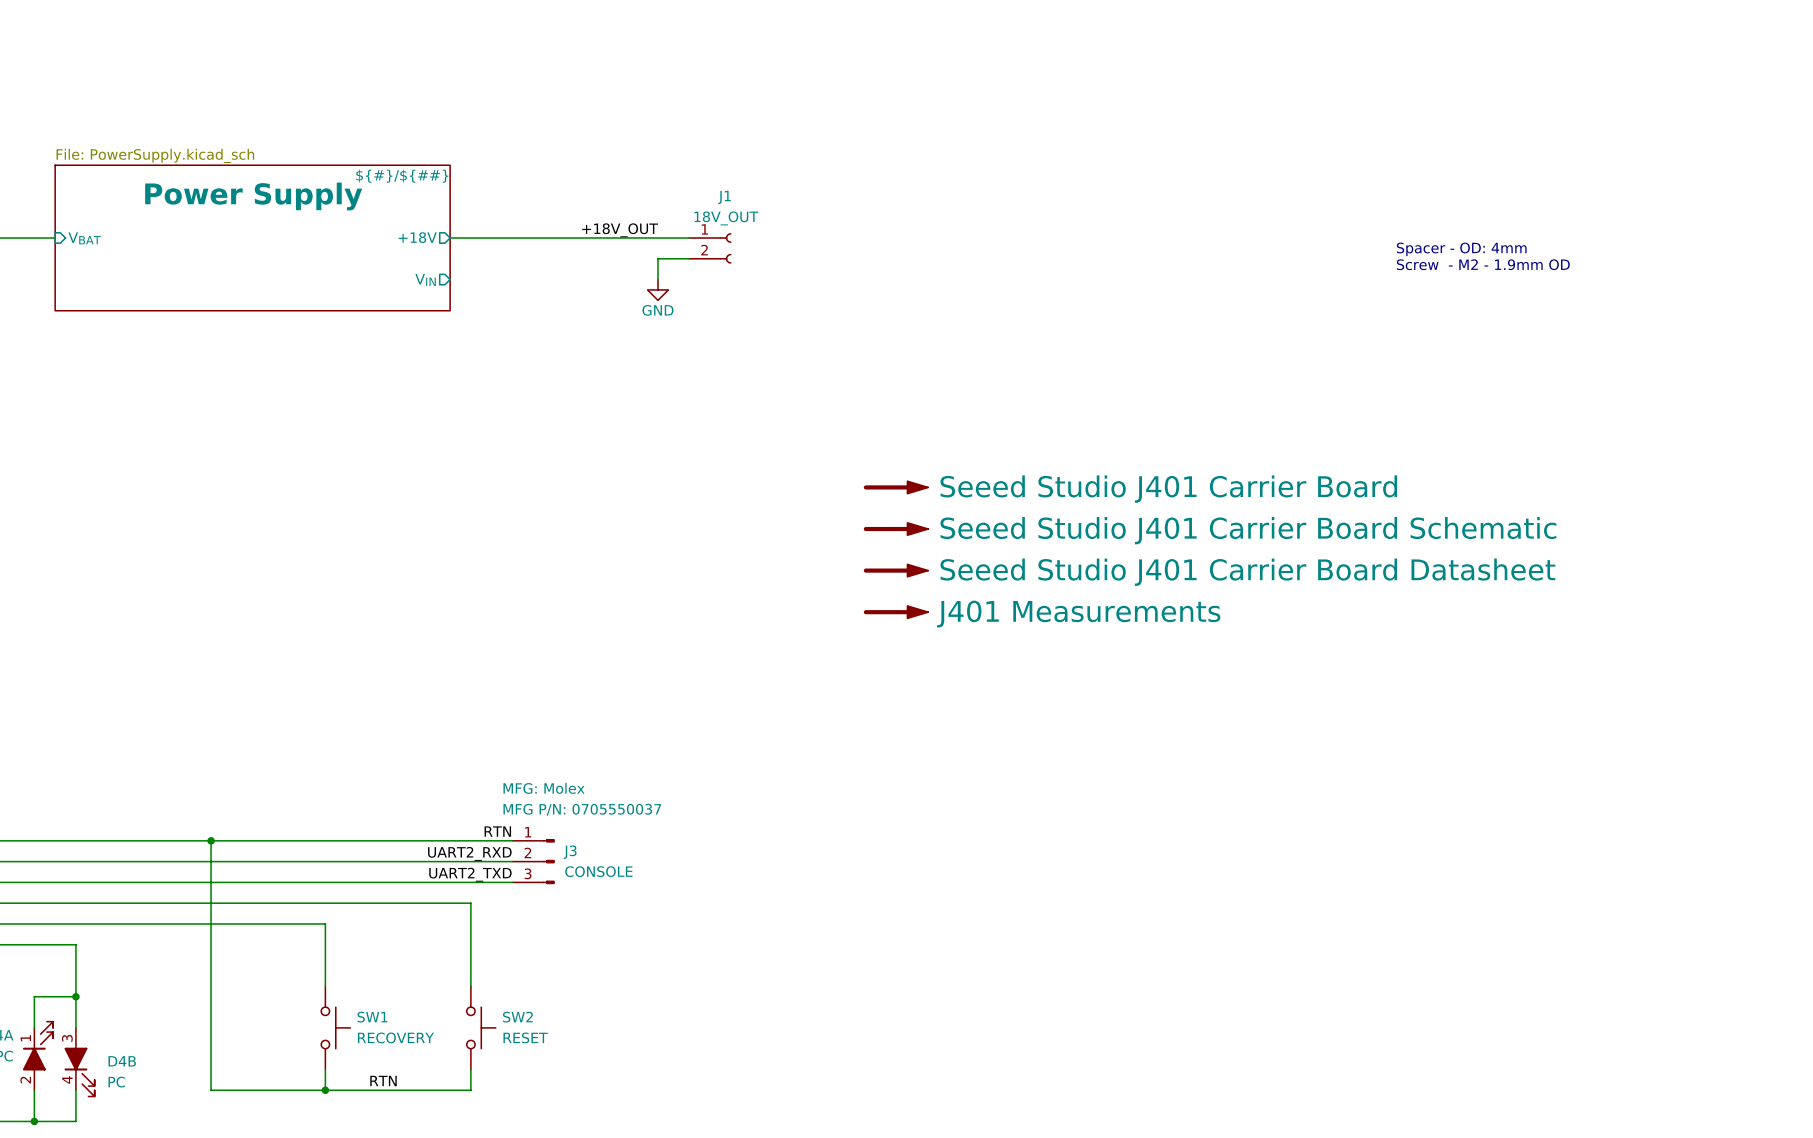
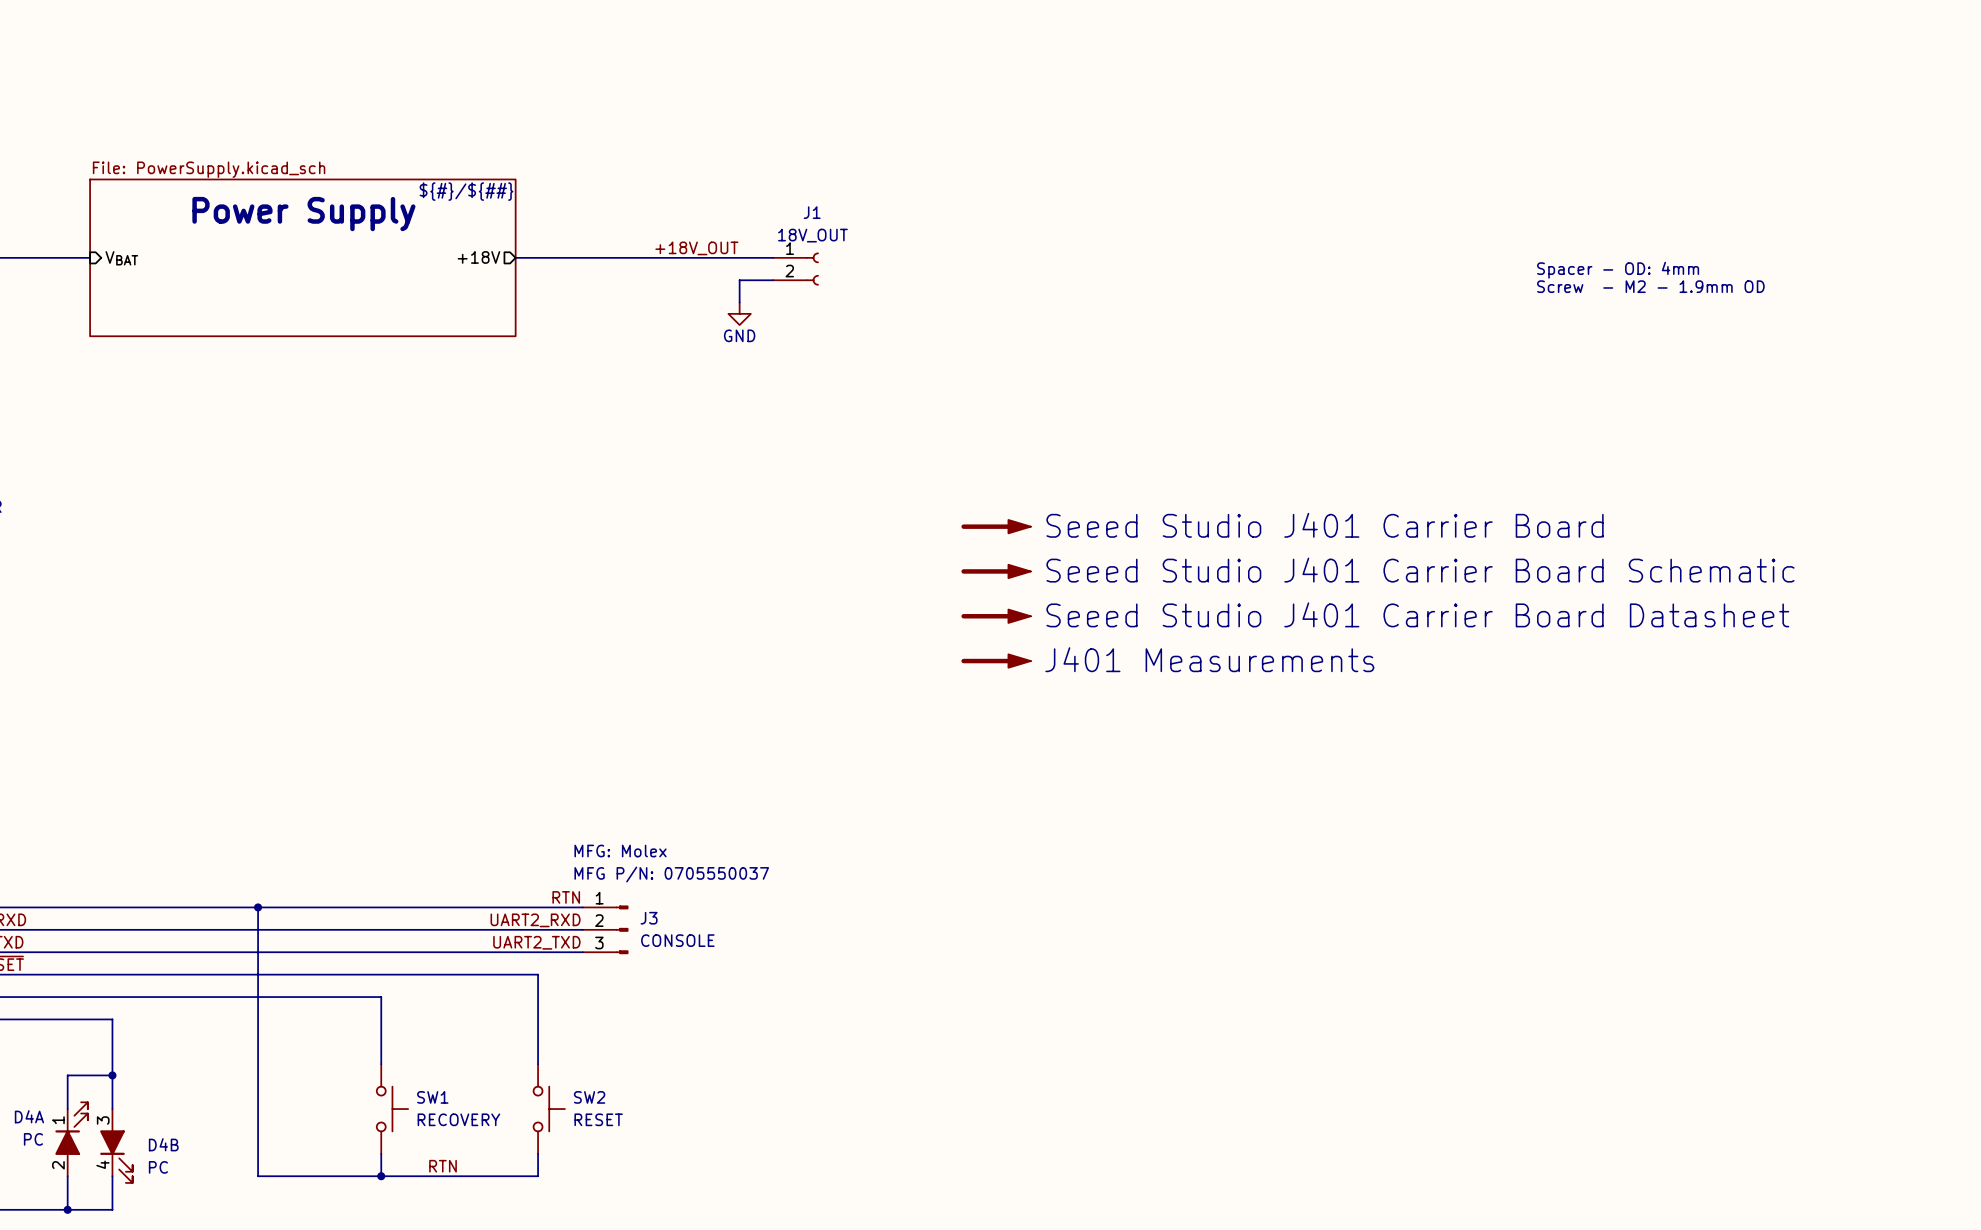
sheet pin: VIN (425, 279) -> none

